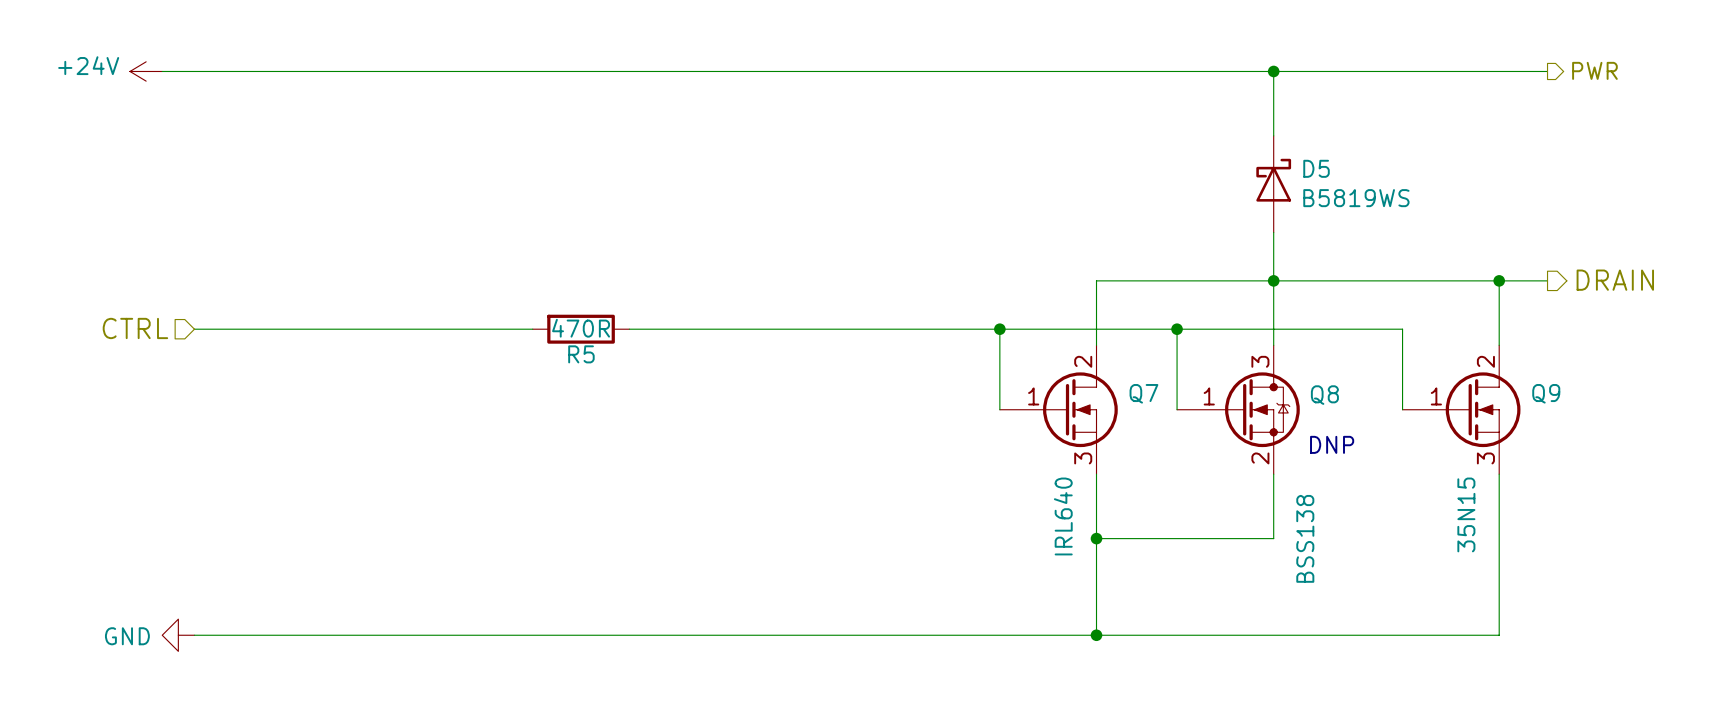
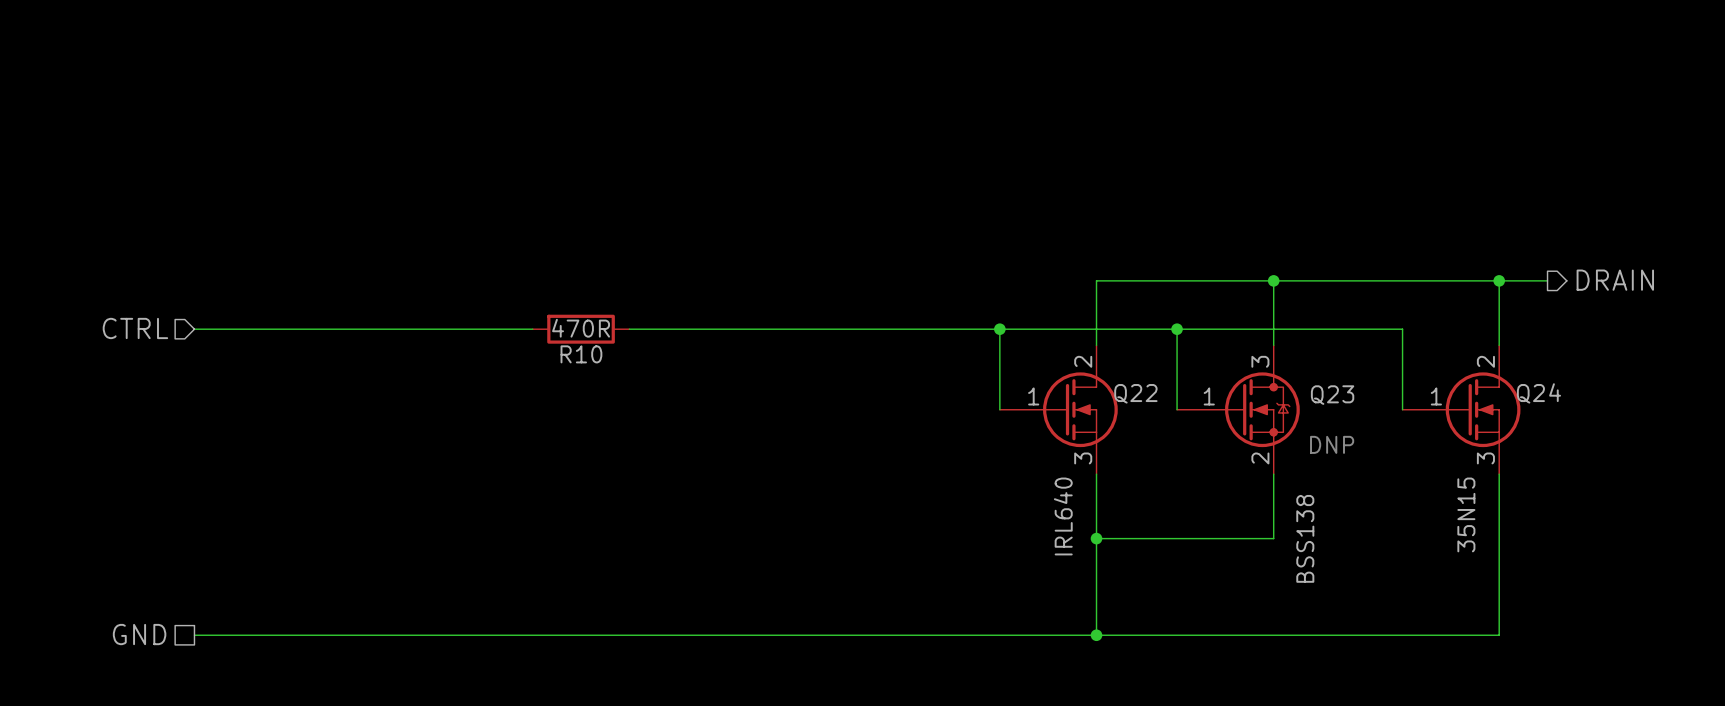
hierarchical label: PWR (1594, 70) -> none
power symbol: +24V (146, 71) -> none
wire: (162, 71) (1547, 71) -> none
wire: (1273, 71) (1273, 135) -> none
junction: (1273, 71) -> none
D5: B5819WS (1273, 184) -> none
wire: (1273, 232) (1273, 280) -> none
R5 name: R5 (581, 354) -> R10 (581, 354)
Q7 name: Q7 (1143, 393) -> Q22 (1135, 393)
Q9 name: Q9 (1546, 393) -> Q24 (1538, 393)
Q8 name: Q8 (1324, 395) -> Q23 (1332, 395)
hierarchical label: none -> GND (139, 634)
power symbol: GND (178, 635) -> none

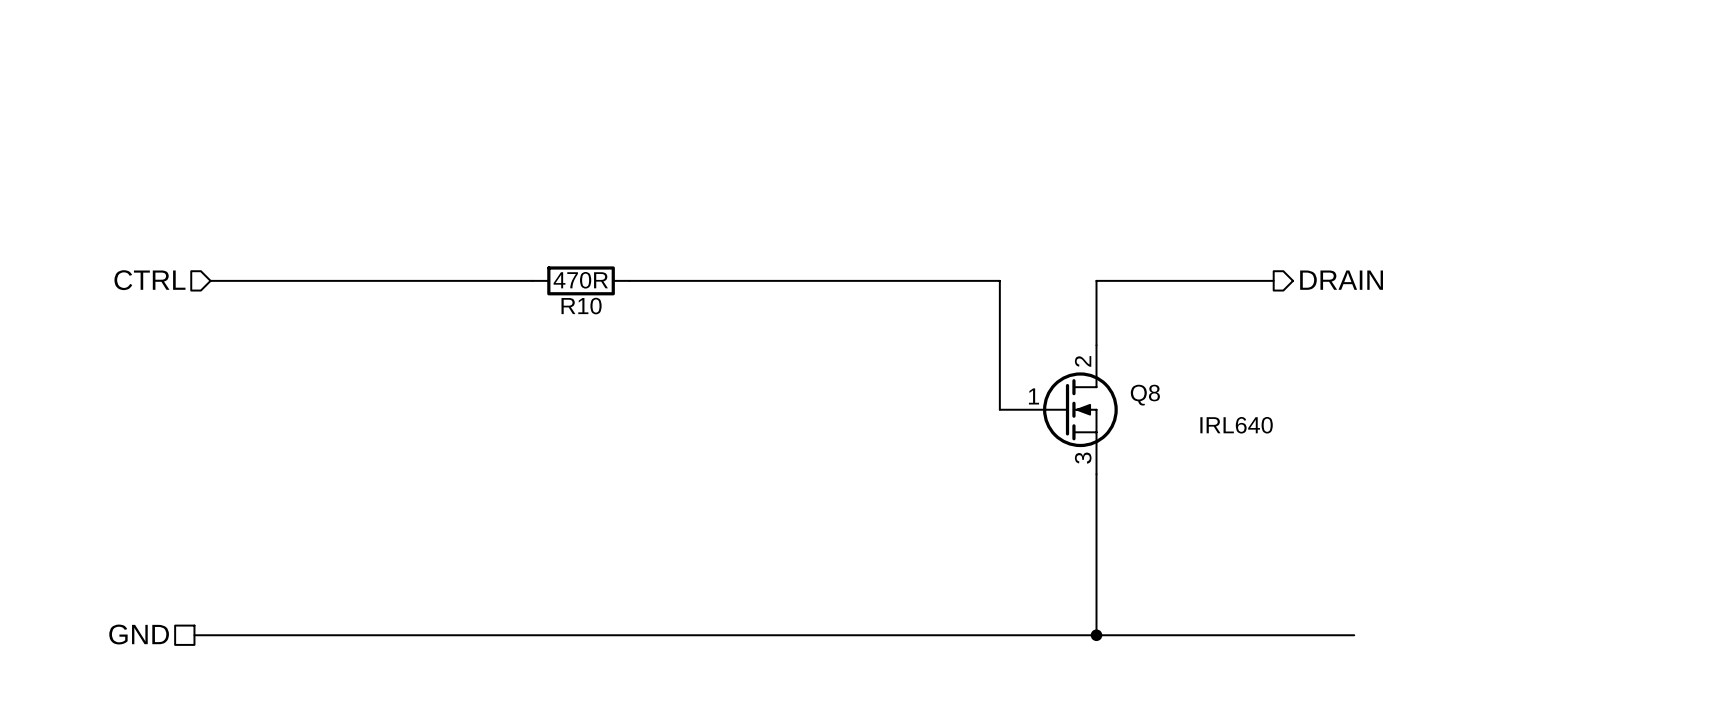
wire: none -> (210, 280) (532, 280)
wire: none -> (629, 280) (999, 280) (999, 329)
junction: (1273, 280) -> none
wire: (1499, 280) (1499, 345) -> none
junction: (1499, 280) -> none
wire: (1547, 280) (1273, 280) (1273, 345) -> none
hierarchical label position: DRAIN (1615, 280) -> DRAIN (1341, 280)
hierarchical label position: CTRL (135, 328) -> CTRL (149, 280)
wire: (194, 329) (532, 329) -> none
R10 position: (581, 329) -> (581, 280)
wire: (629, 329) (1402, 329) (1402, 409) -> none
junction: (999, 329) -> none
wire: (1177, 329) (1177, 409) -> none
junction: (1177, 329) -> none
Q22 name: Q22 (1135, 393) -> Q8 (1145, 395)
Q23: BSS138 (1238, 409) -> none
Q24: 35N15 (1461, 409) -> none
text: DNP (1332, 444) -> none
wire: (1273, 474) (1273, 538) (1096, 538) -> none
wire: (1499, 474) (1499, 635) (1354, 635) -> none
Q22 value rotation: 0° (1063, 516) -> 90° clockwise (1236, 425)
Q22 value position: IRL640 (1063, 516) -> IRL640 (1236, 425)
junction: (1096, 538) -> none

